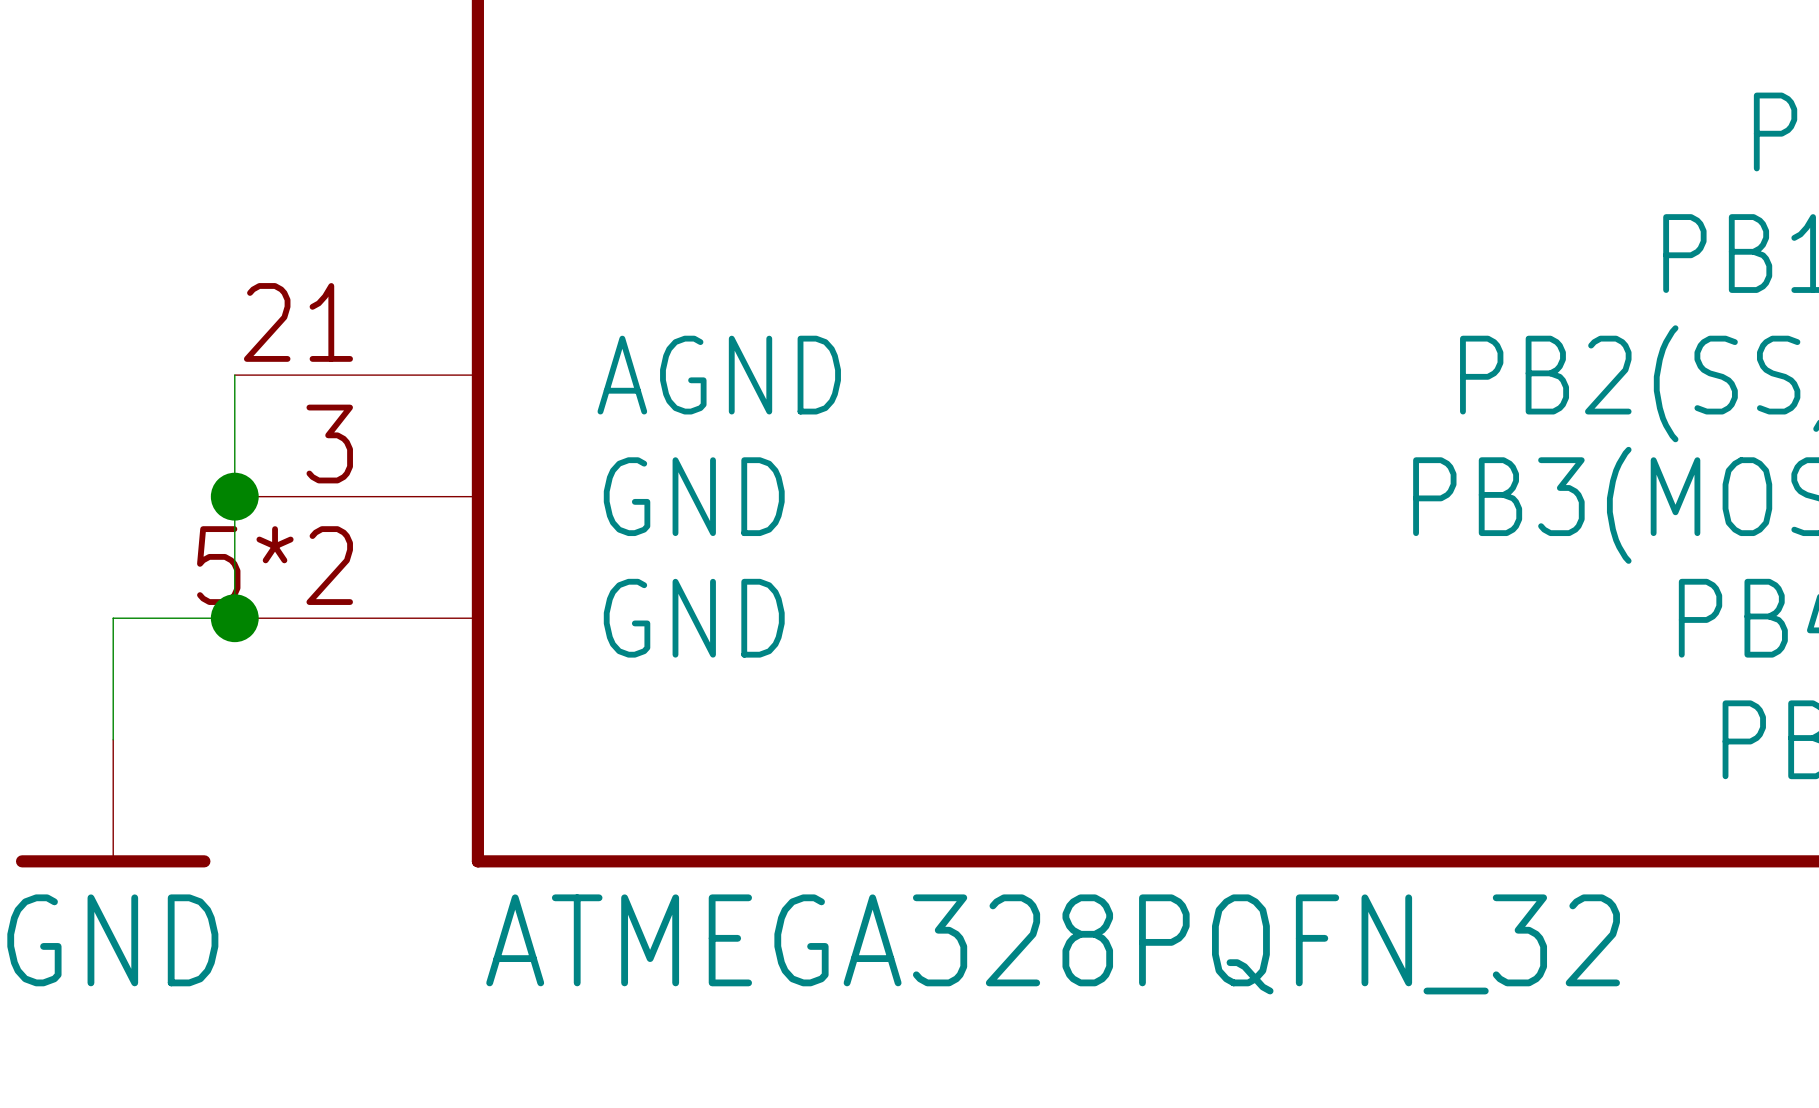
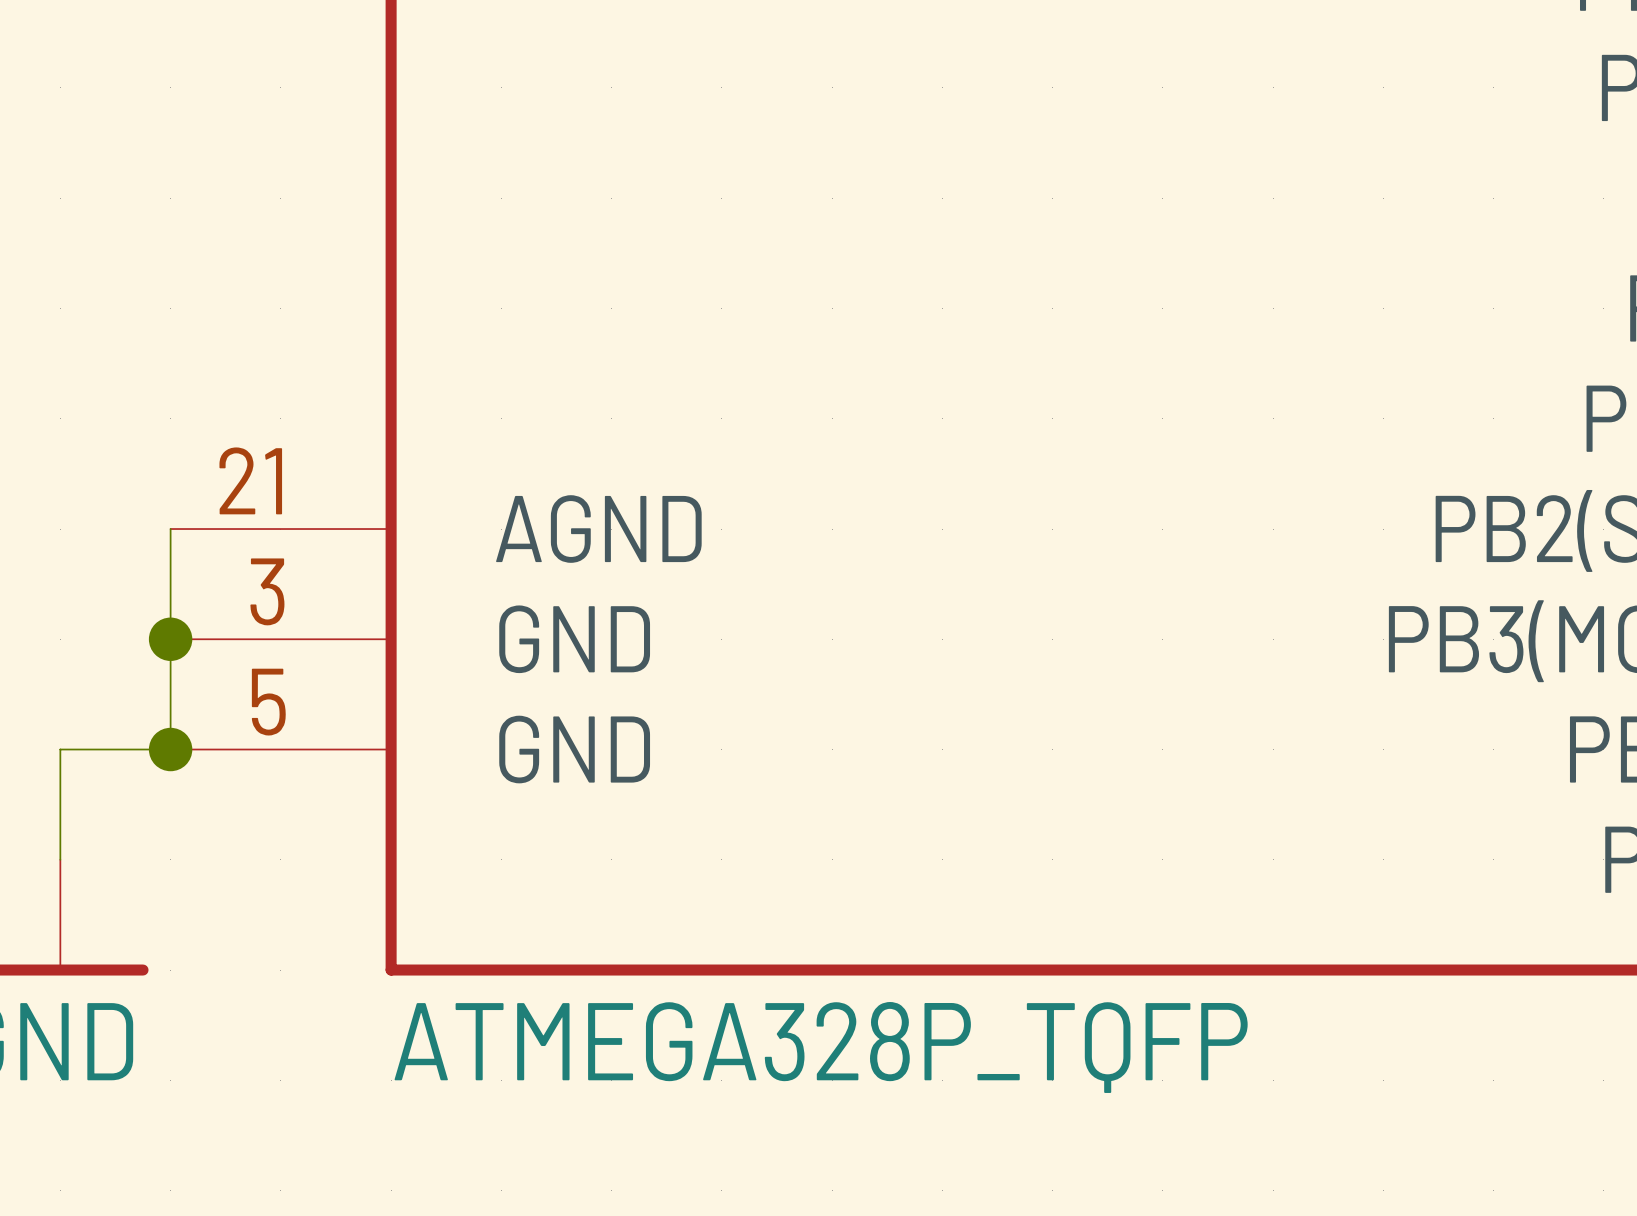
part pin number: 5*2 (275, 565) -> 5 (268, 702)
part value: ATMEGA328PQFN_32 (1053, 944) -> ATMEGA328P_TQFP (821, 1047)

